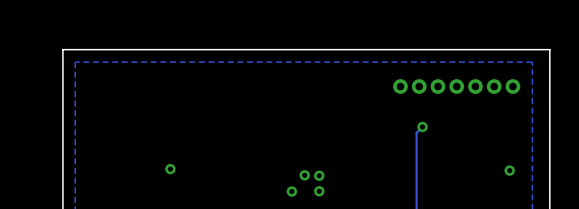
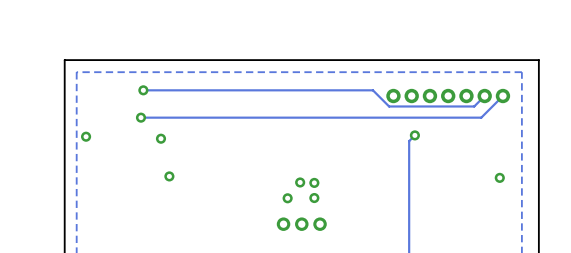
track: none -> (143, 90) (372, 90) (389, 106) (474, 106) (484, 96)
via: none -> (143, 90)
track: none -> (502, 96) (481, 117) (140, 117)
via: none -> (140, 117)
via: none -> (86, 136)
via: none -> (160, 138)

